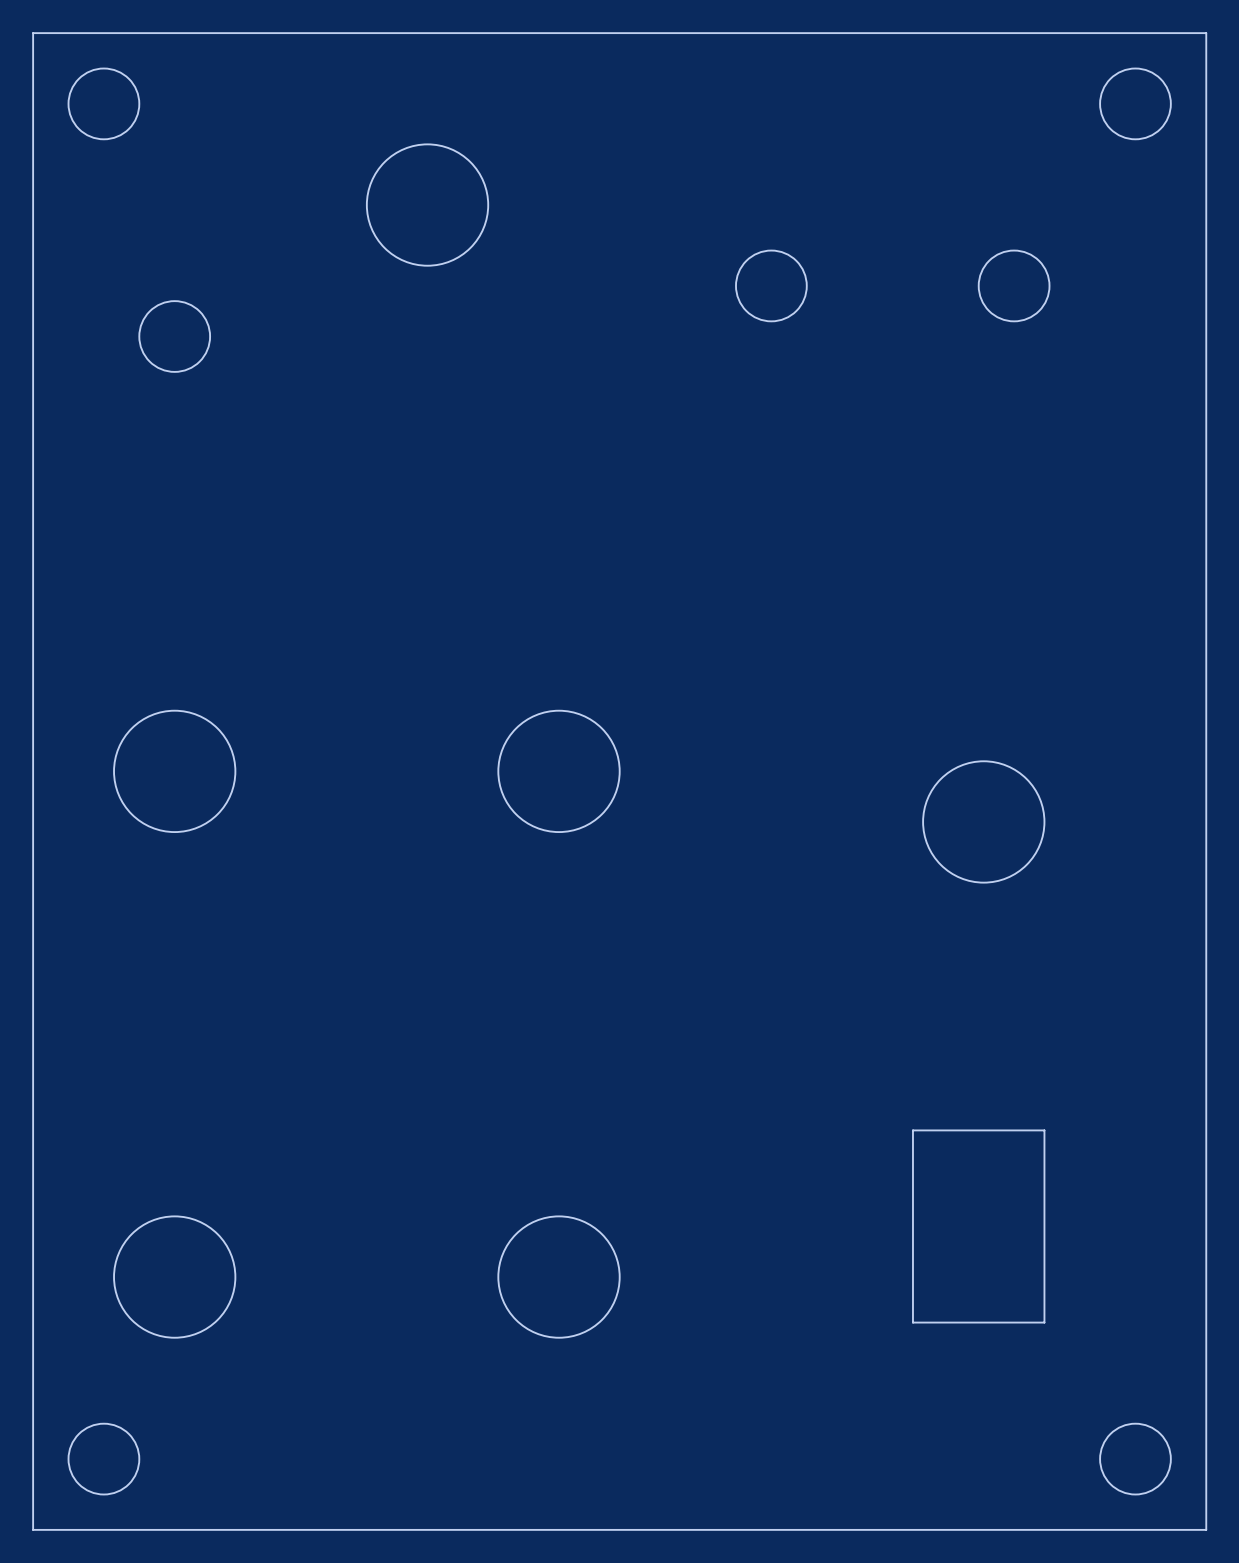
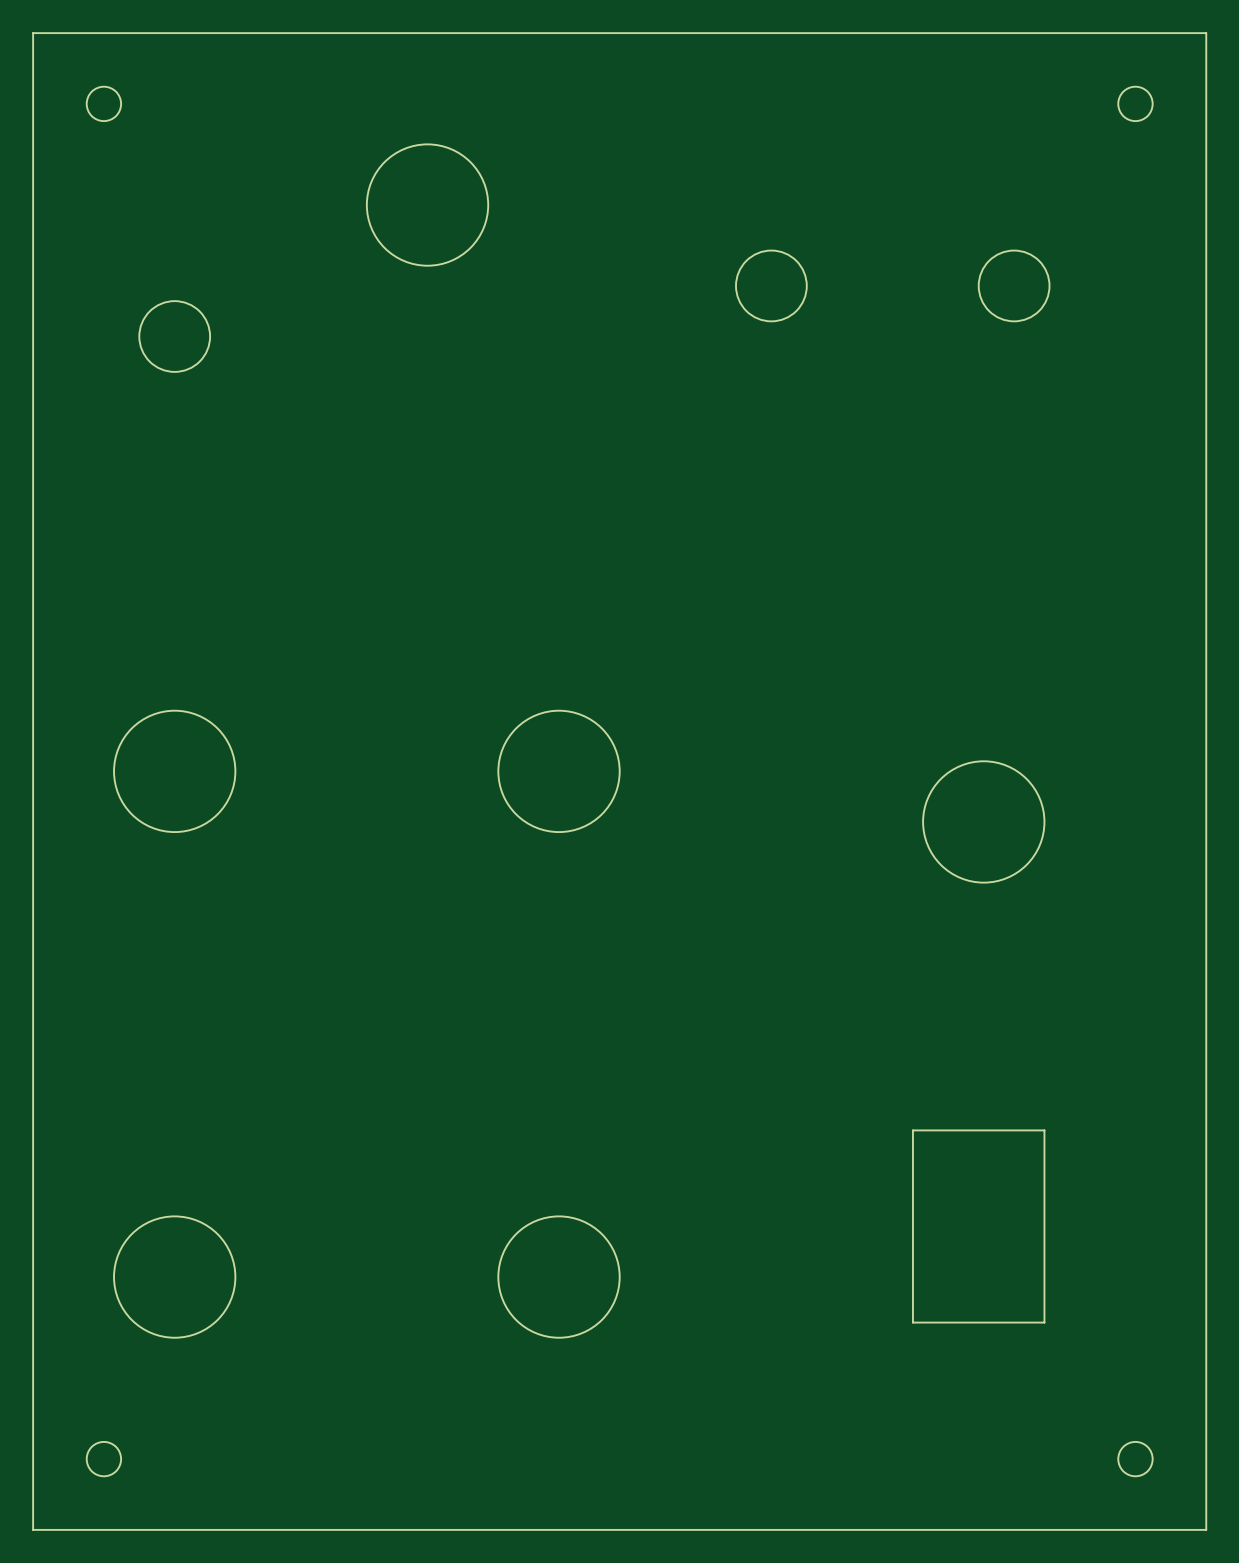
round board edge size: [68, 68, 140, 140] -> [86, 86, 122, 122]
round board edge size: [1099, 68, 1172, 140] -> [1118, 86, 1153, 122]
round board edge size: [68, 1423, 140, 1495] -> [86, 1441, 122, 1477]
round board edge size: [1099, 1423, 1172, 1495] -> [1118, 1441, 1153, 1477]

